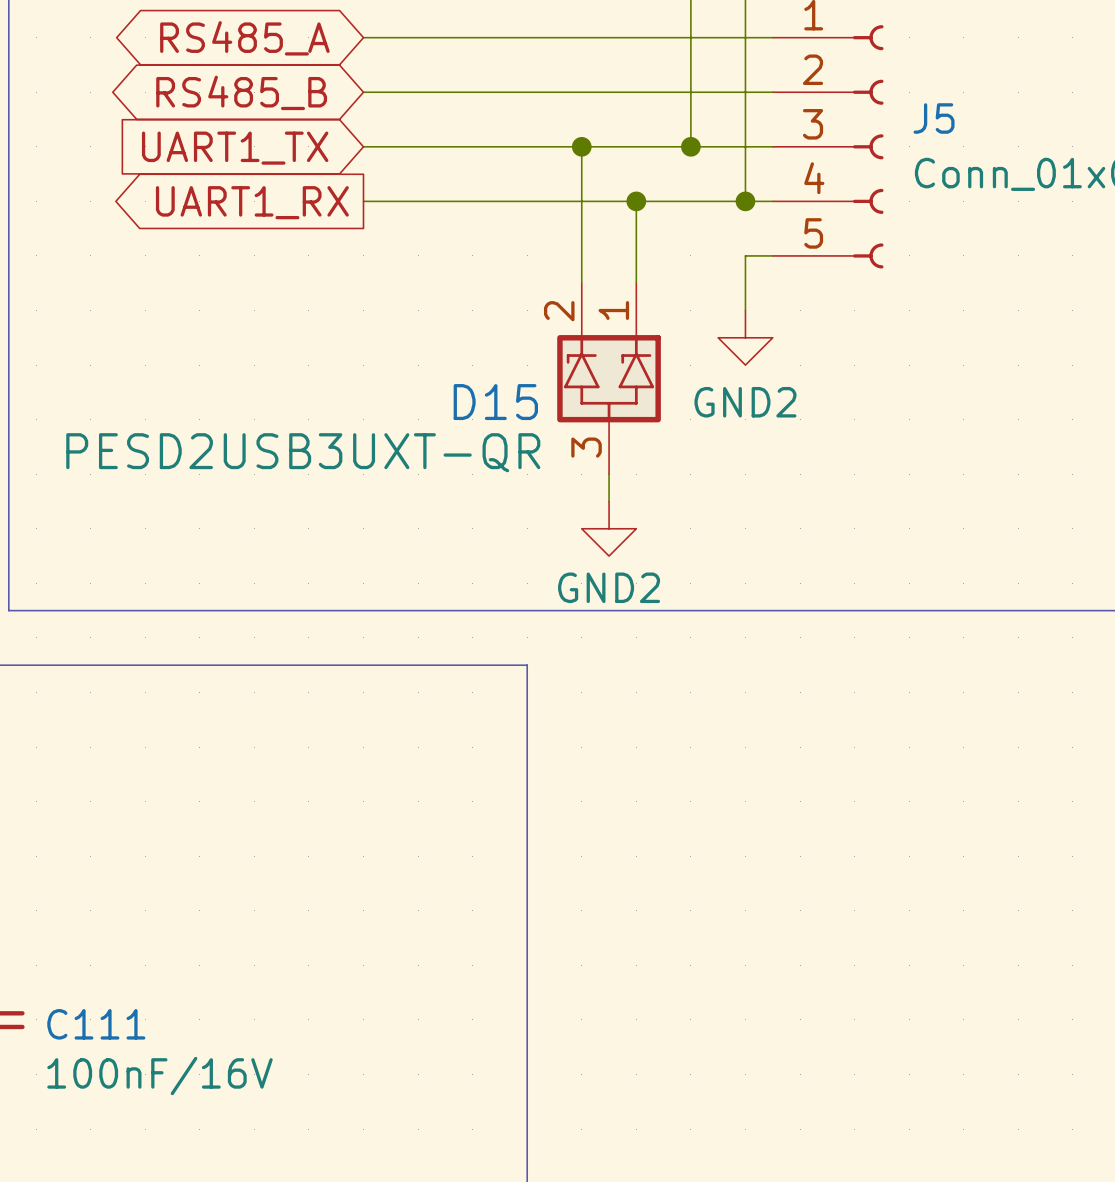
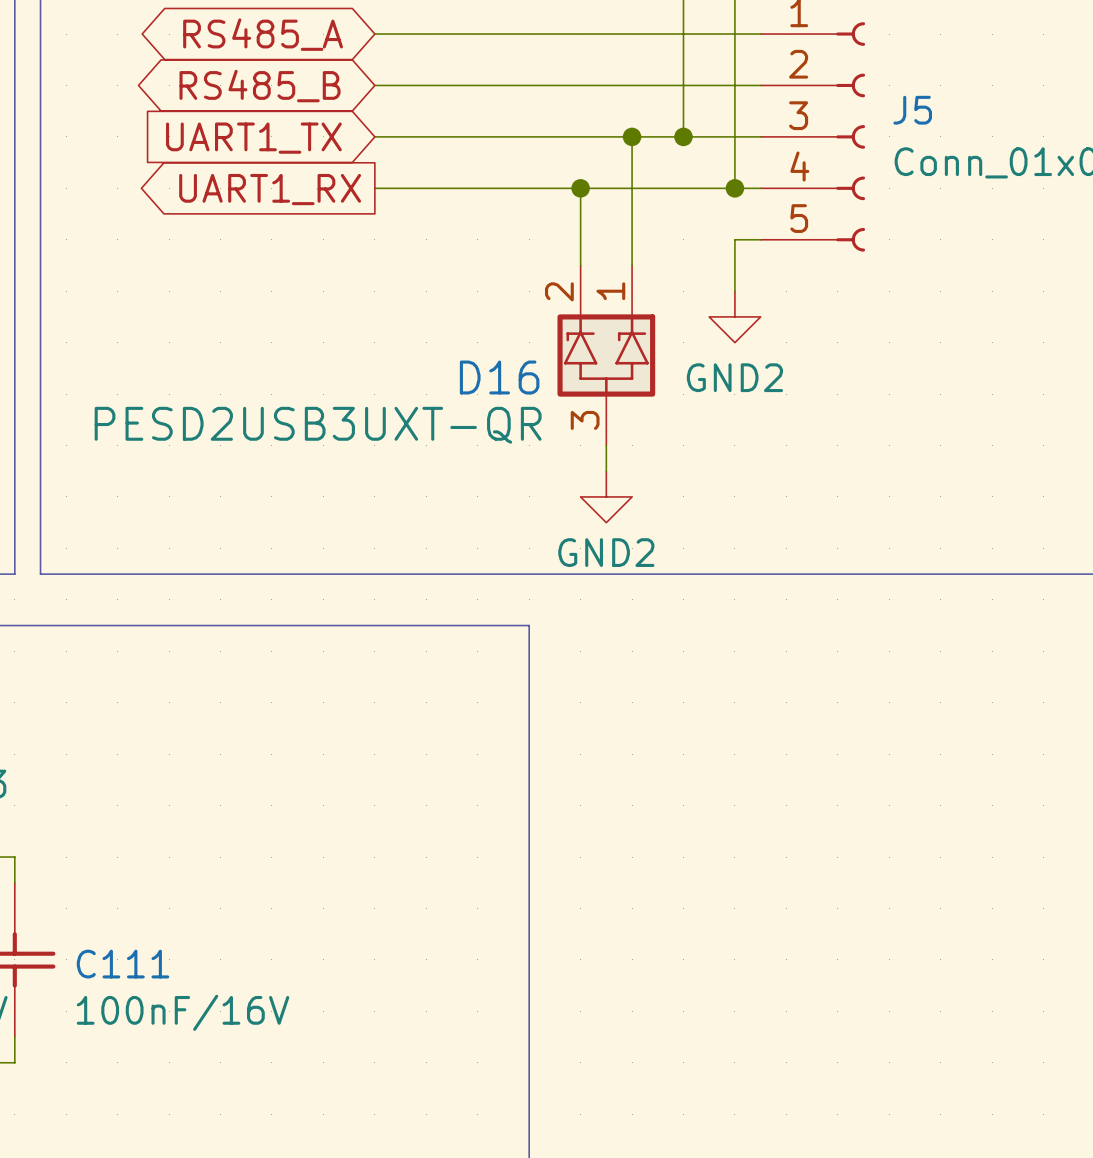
wire: (581, 146) (581, 201) -> (632, 136) (632, 188)
junction: (581, 146) -> none
junction: none -> (632, 136)
junction: none -> (580, 188)
junction: (636, 201) -> none
D15 name: D15 (495, 402) -> D16 (499, 377)

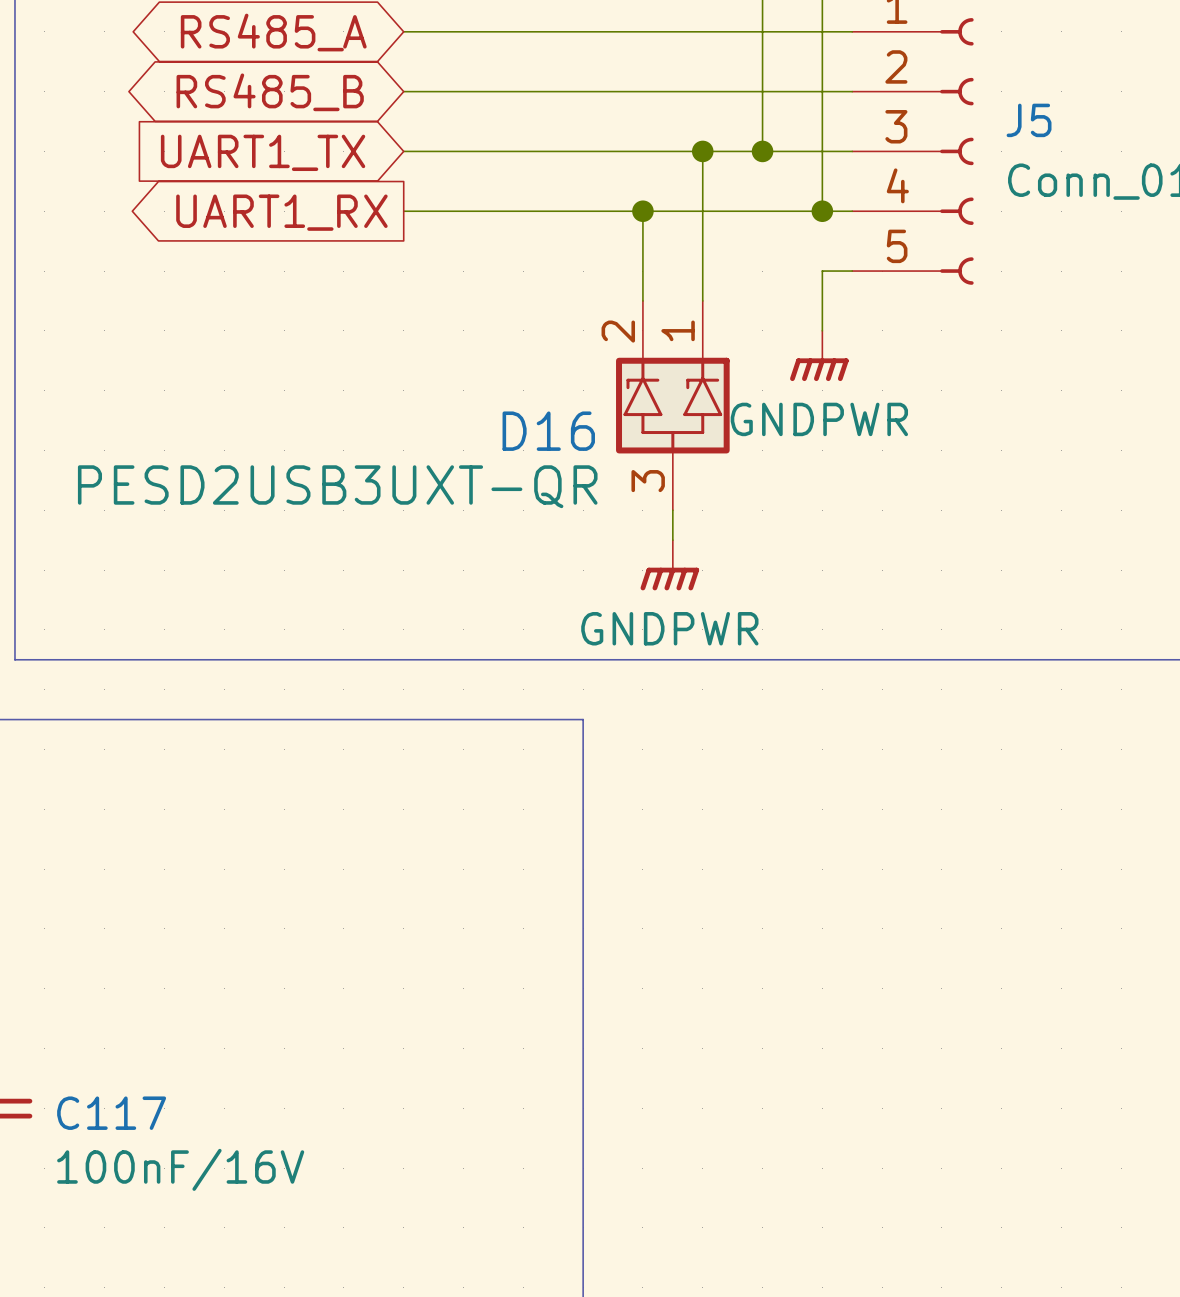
power symbol: GND2 (734, 316) -> GNDPWR (819, 355)
power symbol: GND2 (606, 496) -> GNDPWR (669, 565)
C111 name: C111 (123, 964) -> C117 (111, 1113)

